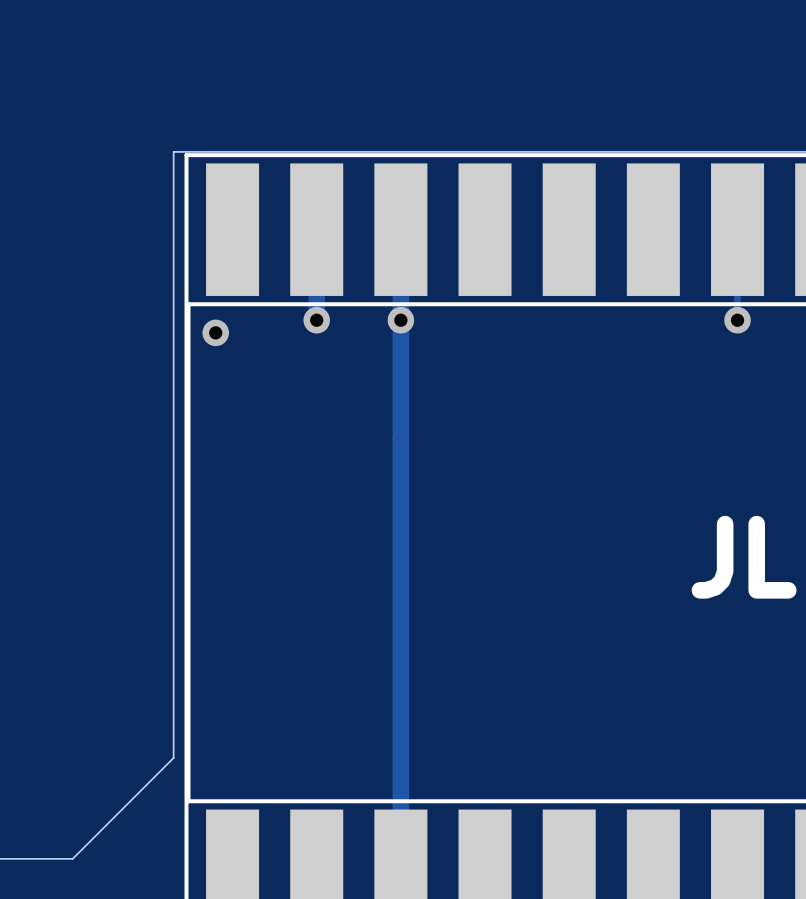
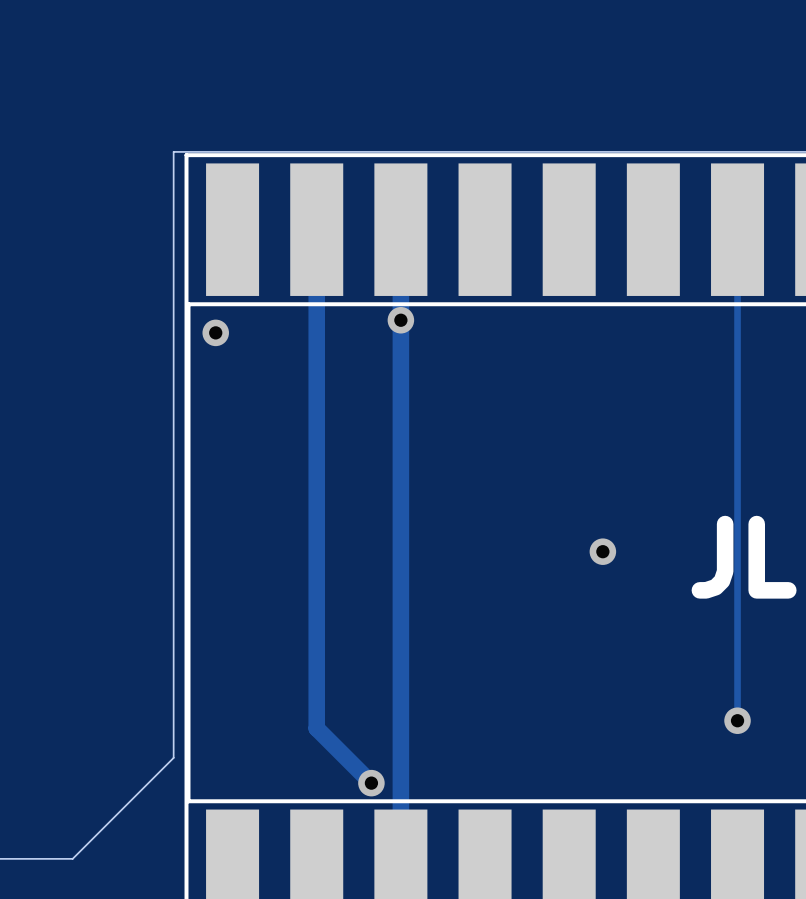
track: none -> (316, 320) (316, 728) (371, 783)
via: (316, 320) -> none
track: none -> (737, 320) (737, 720)
via: (737, 320) -> none
via: none -> (602, 551)
via: none -> (737, 720)
via: none -> (371, 783)

